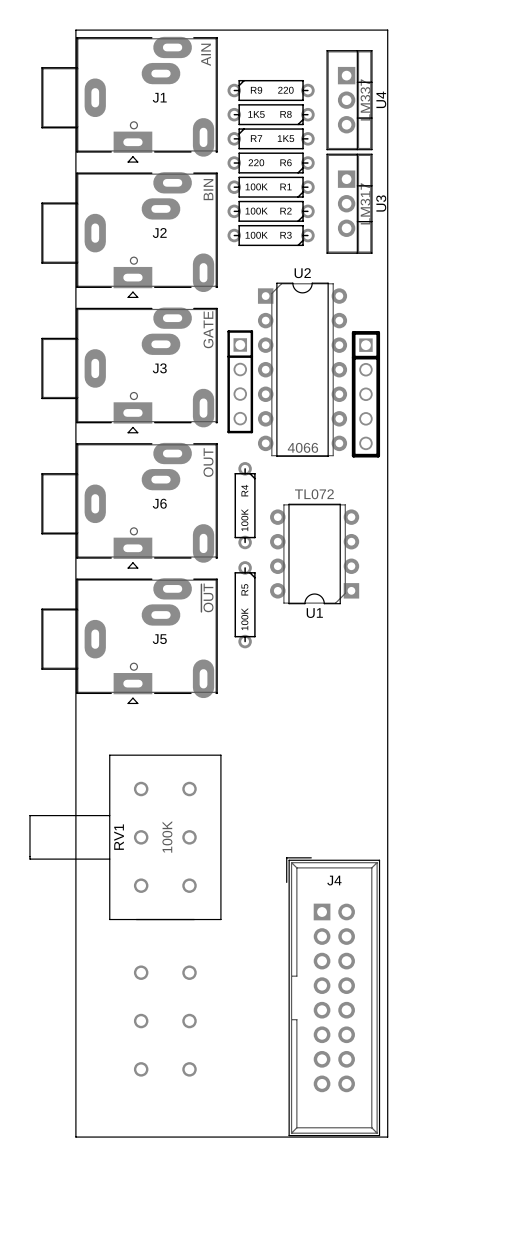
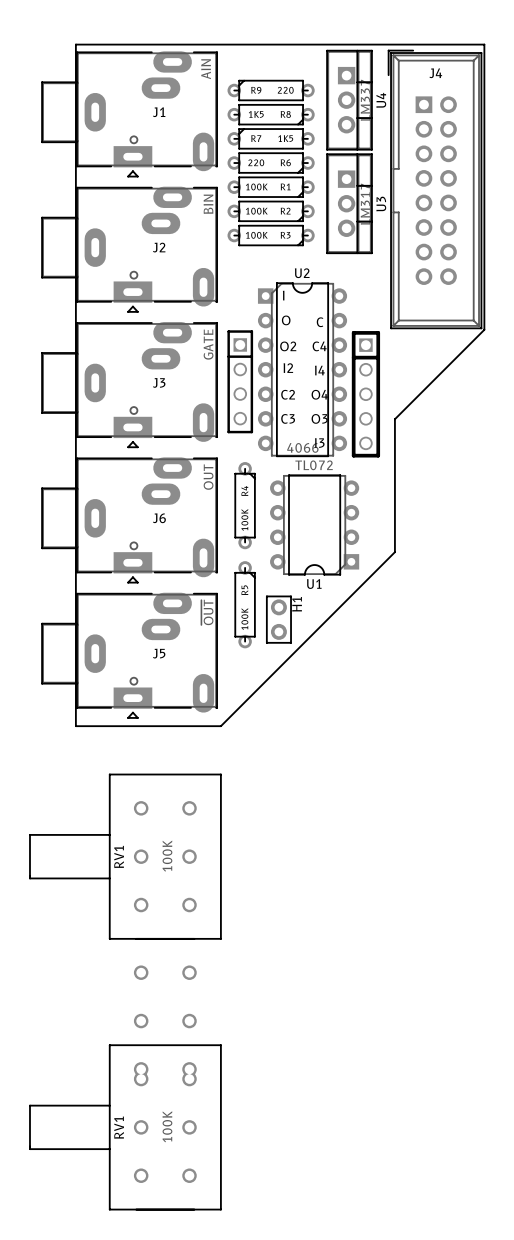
board edge: (75, 44) (75, 30) (387, 30) (387, 1137) (75, 1137) (75, 726) -> (75, 44) (484, 44) (484, 329) (394, 419) (394, 552) (220, 726) (75, 726)
J1 position: (129, 99) -> (129, 114)
J2 position: (129, 235) -> (129, 249)
text: none -> I (283, 295)
text: none -> O (286, 320)
text: none -> C (320, 322)
text: none -> O2 (288, 346)
text: none -> C4 (319, 346)
text: none -> I2 (288, 368)
J3 position: (129, 370) -> (129, 384)
text: none -> I4 (319, 370)
text: none -> C2 (288, 394)
text: none -> O4 (319, 394)
text: none -> C3 (288, 418)
text: none -> O3 (319, 418)
text: none -> I3 (319, 443)
J6 position: (129, 505) -> (129, 520)
U1 position: (314, 553) -> (314, 524)
H1: none -> (278, 619)
J5 position: (129, 641) -> (129, 655)
RV1 position: (125, 837) -> (125, 856)
J4 position: (333, 996) -> (435, 189)
RV1: none -> 100K (125, 1127)

